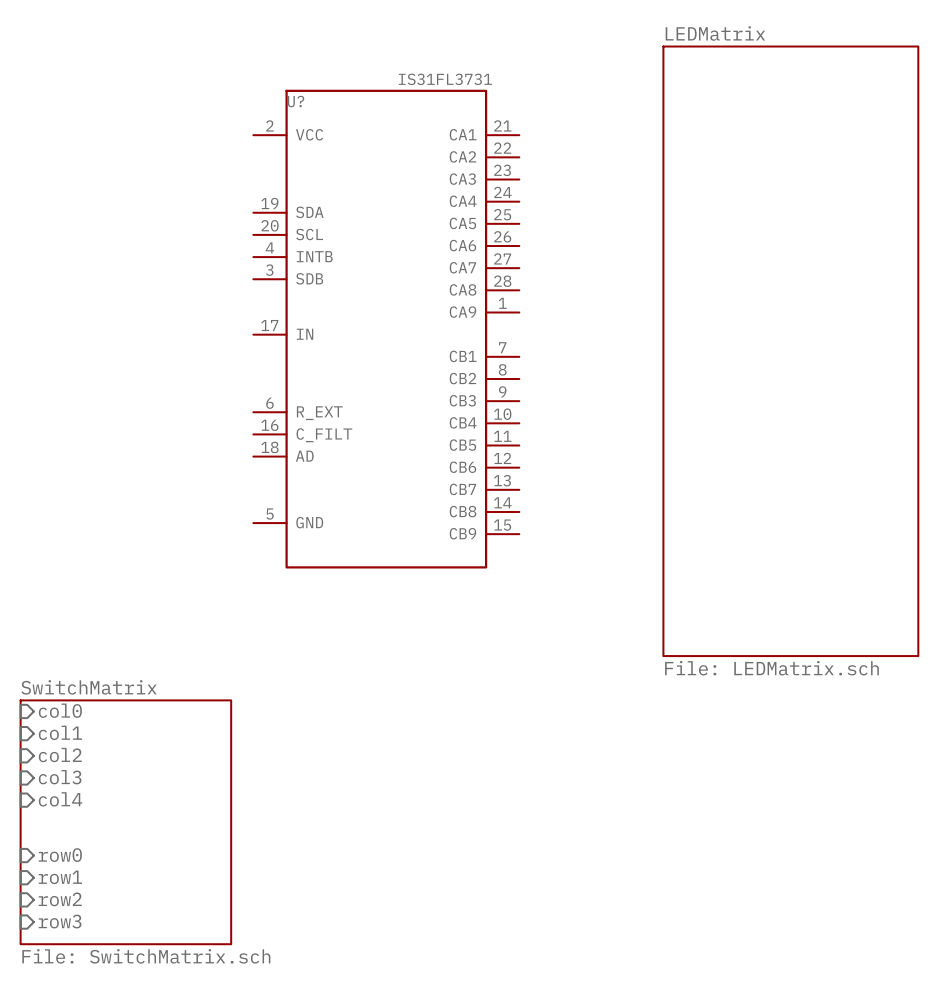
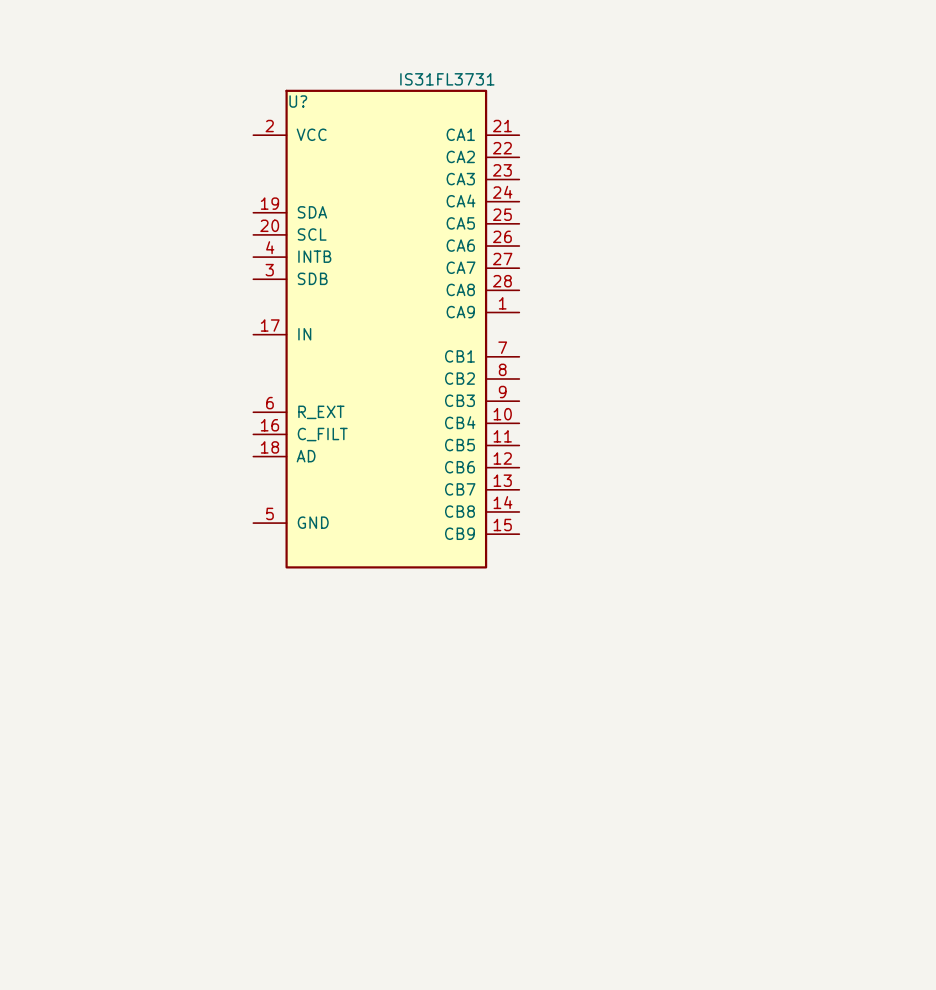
sheet LEDMatrix: File: LEDMatrix.sch (790, 351) -> none
sheet pin: col0 (60, 710) -> none
sheet pin: col1 (60, 732) -> none
sheet pin: col2 (60, 755) -> none
sheet pin: col3 (60, 777) -> none
sheet pin: col4 (60, 799) -> none
sheet SwitchMatrix: File: SwitchMatrix.sch (125, 822) -> none
sheet pin: row0 (60, 855) -> none
sheet pin: row1 (60, 877) -> none
sheet pin: row2 (60, 899) -> none
sheet pin: row3 (60, 921) -> none

